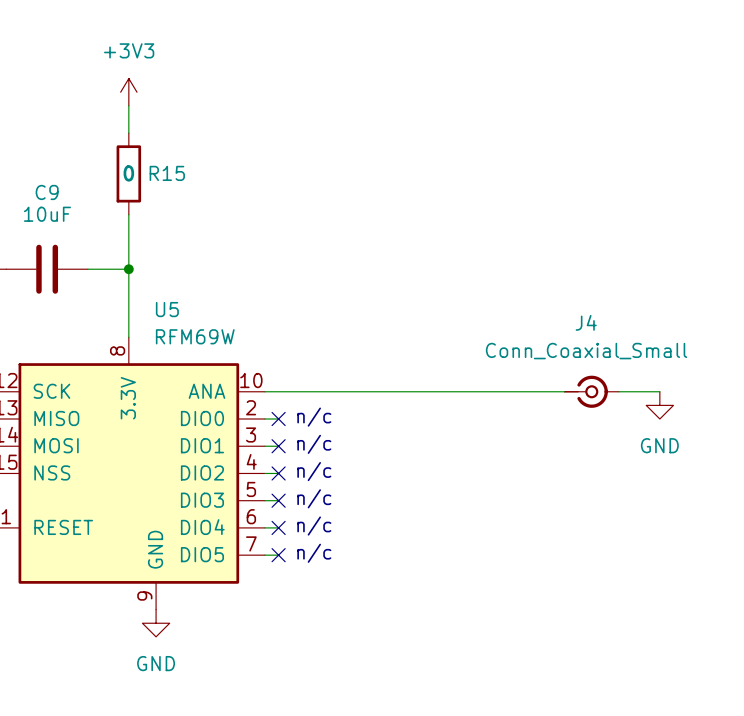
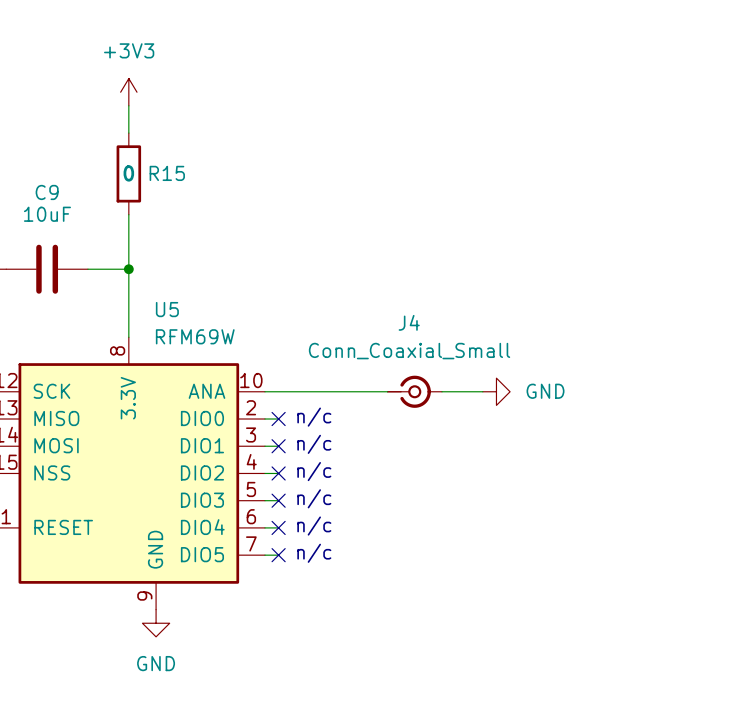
wire: (482, 391) (564, 391) -> none
J4 position: (591, 391) -> (414, 391)
wire: (619, 391) (659, 391) -> none
power symbol rotation: 0° (659, 405) -> 90° counterclockwise (496, 391)
power symbol position: GND (659, 405) -> GND (496, 391)

